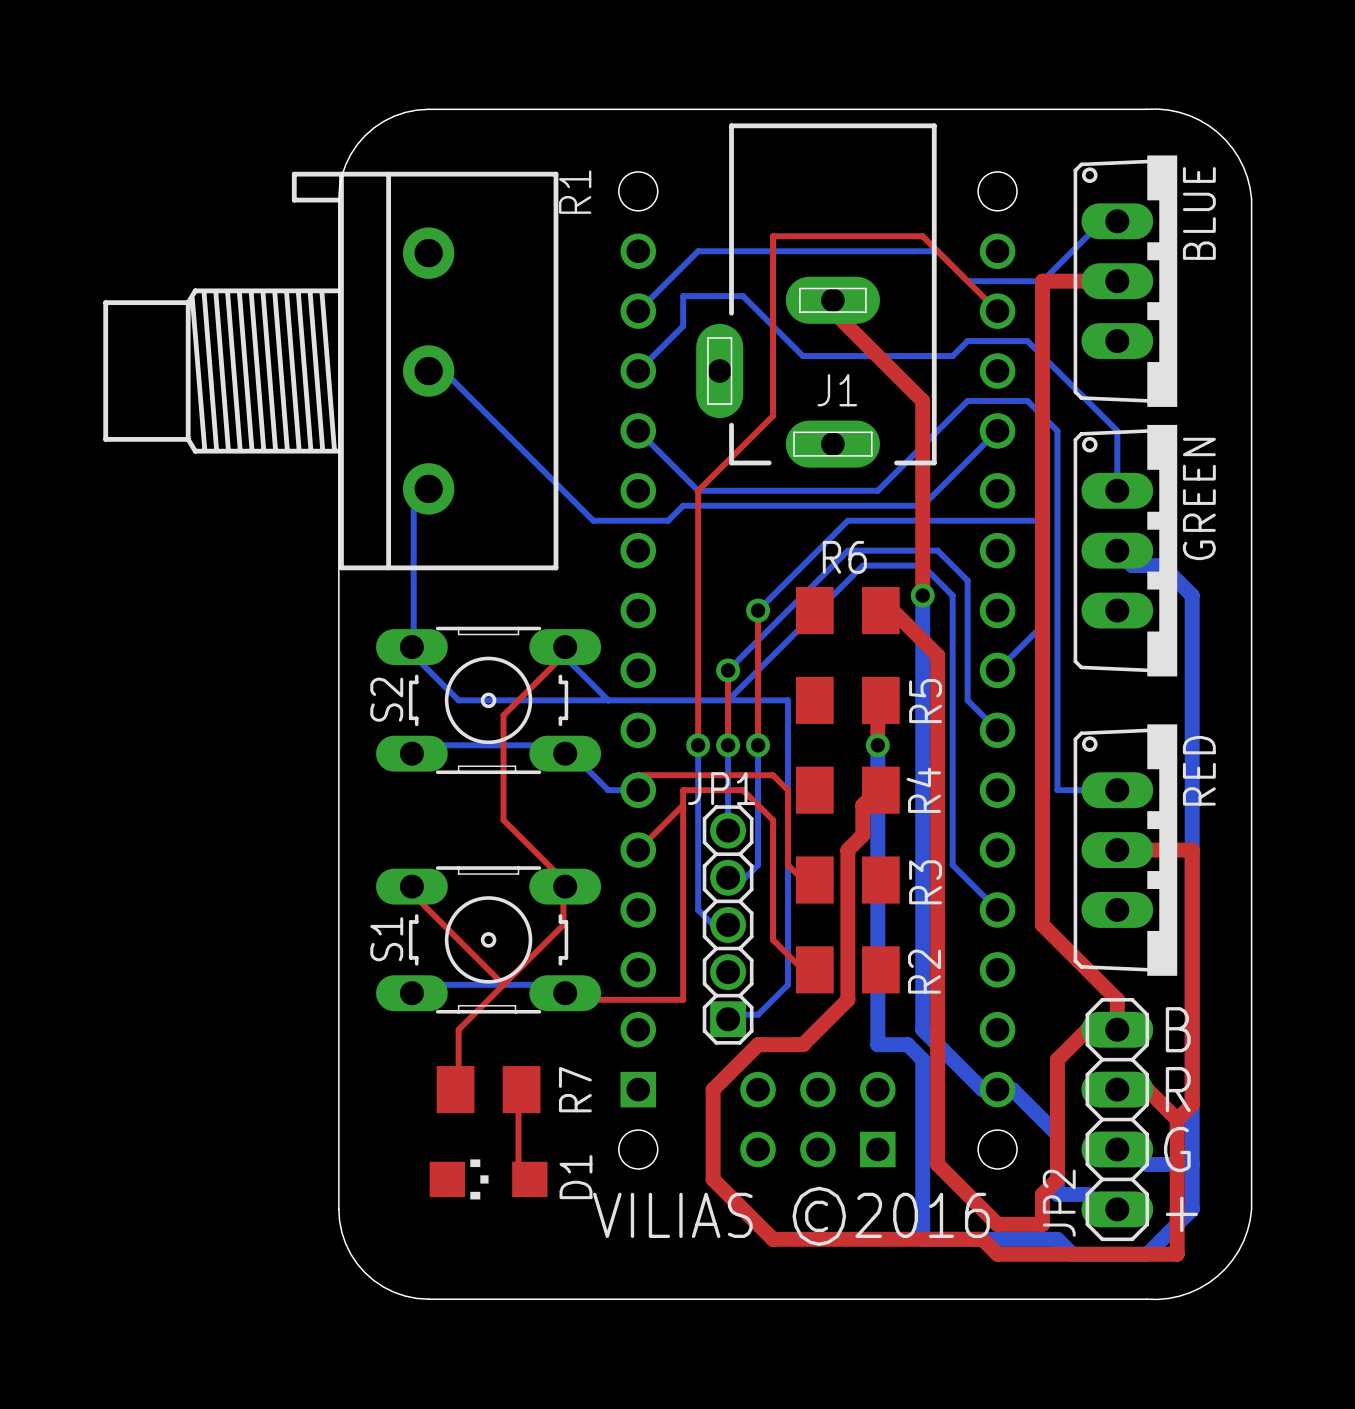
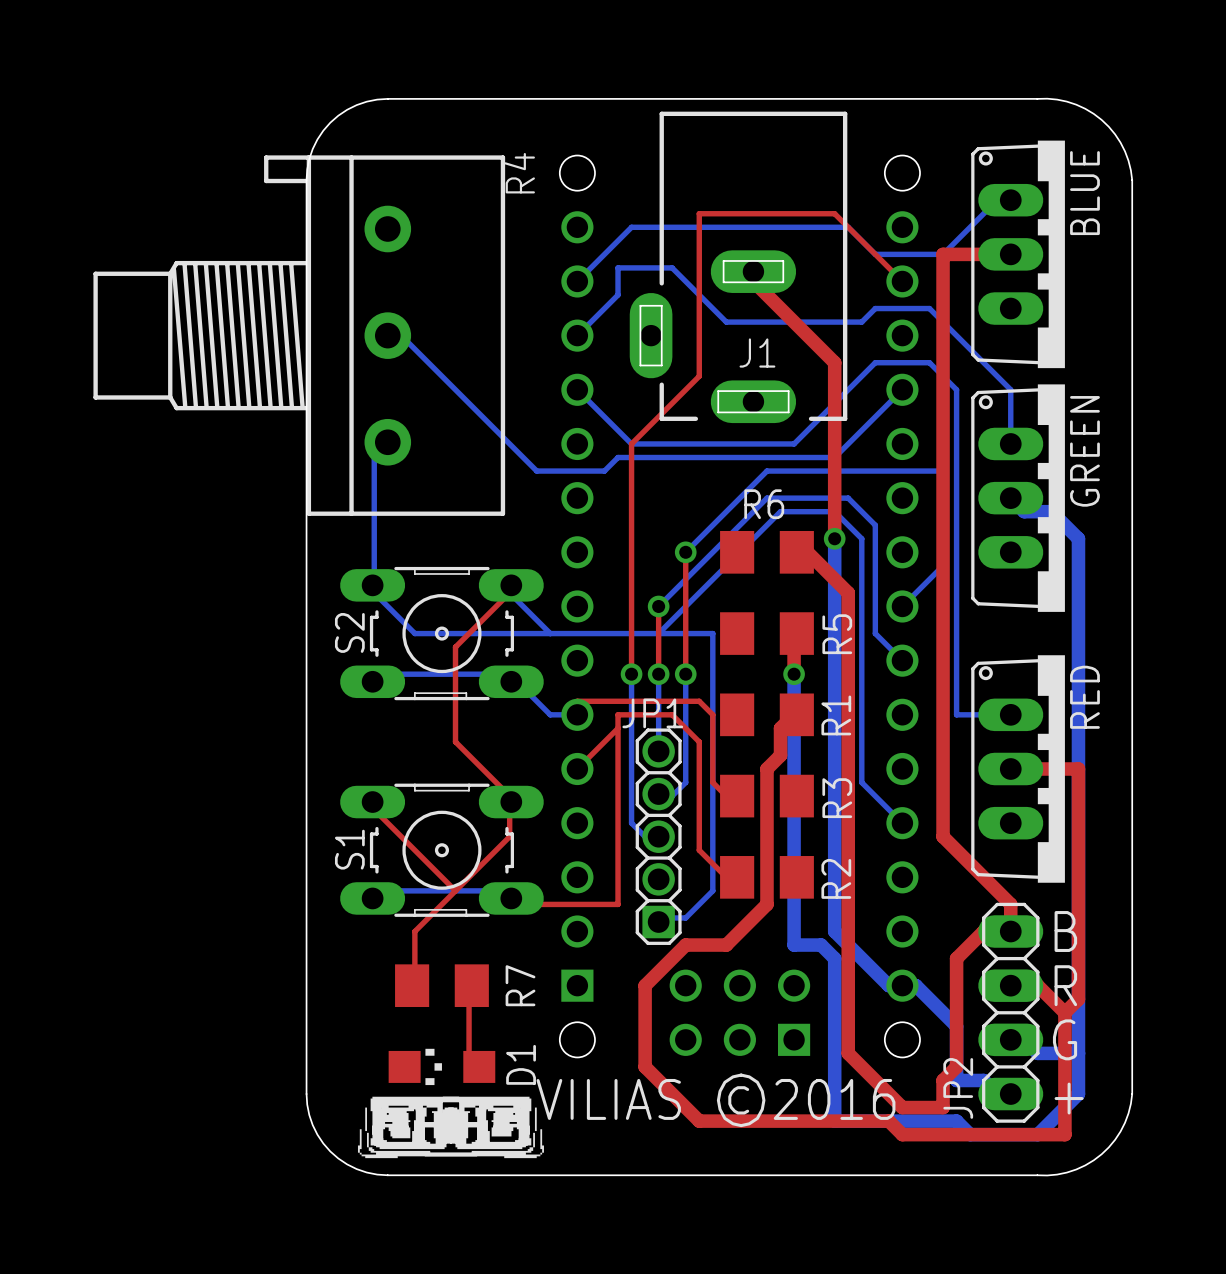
R1 name: R1 (575, 192) -> R4 (519, 173)
R4 name: R4 (923, 790) -> R1 (836, 715)
drawing: none -> [357, 1096, 544, 1159]

